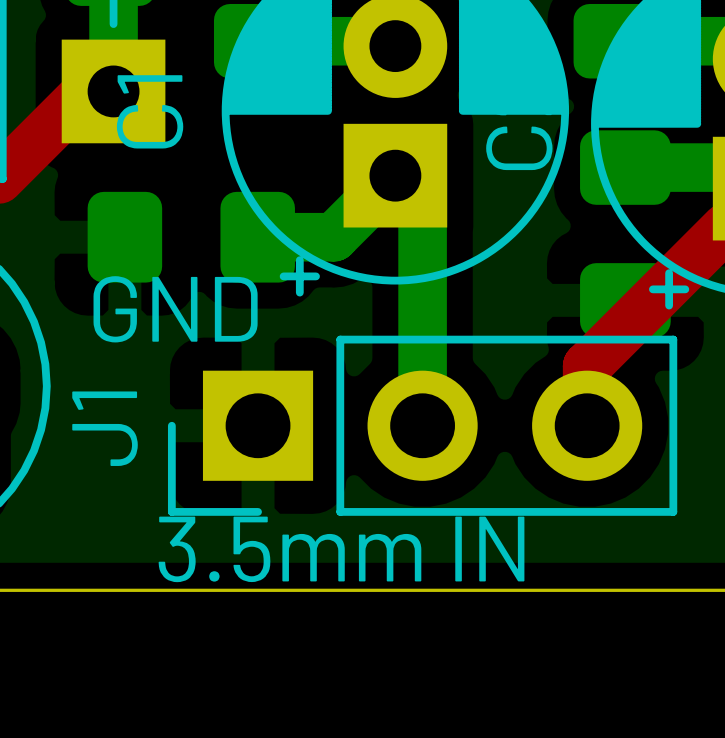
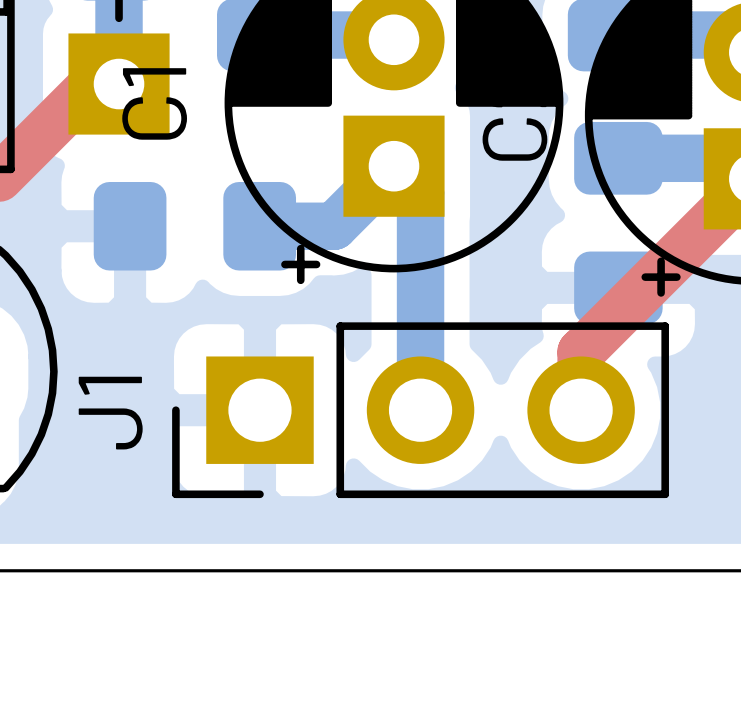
text: GND (175, 309) -> none
text: 3.5mm IN (341, 549) -> none

